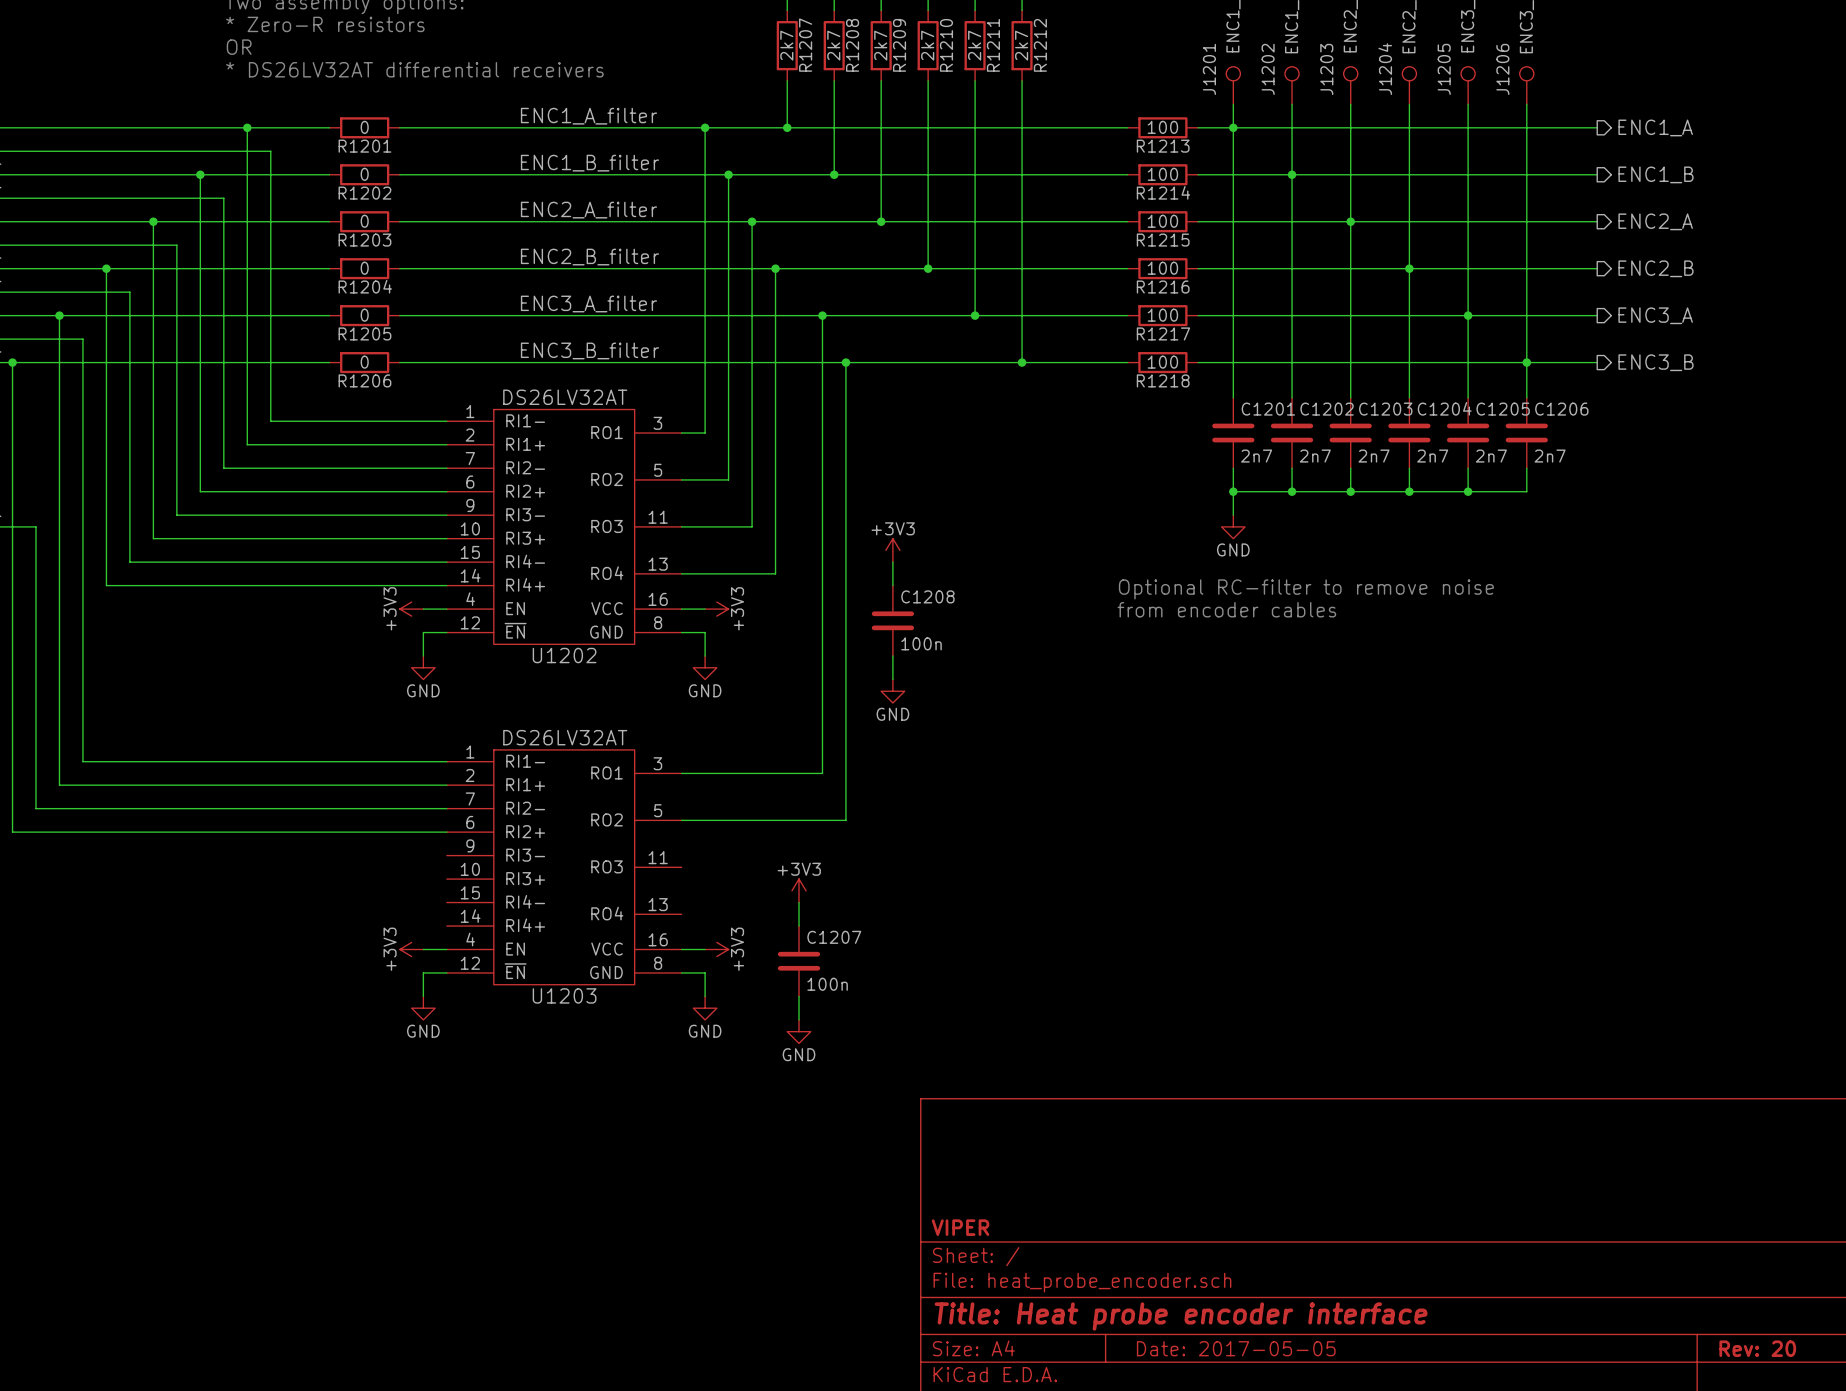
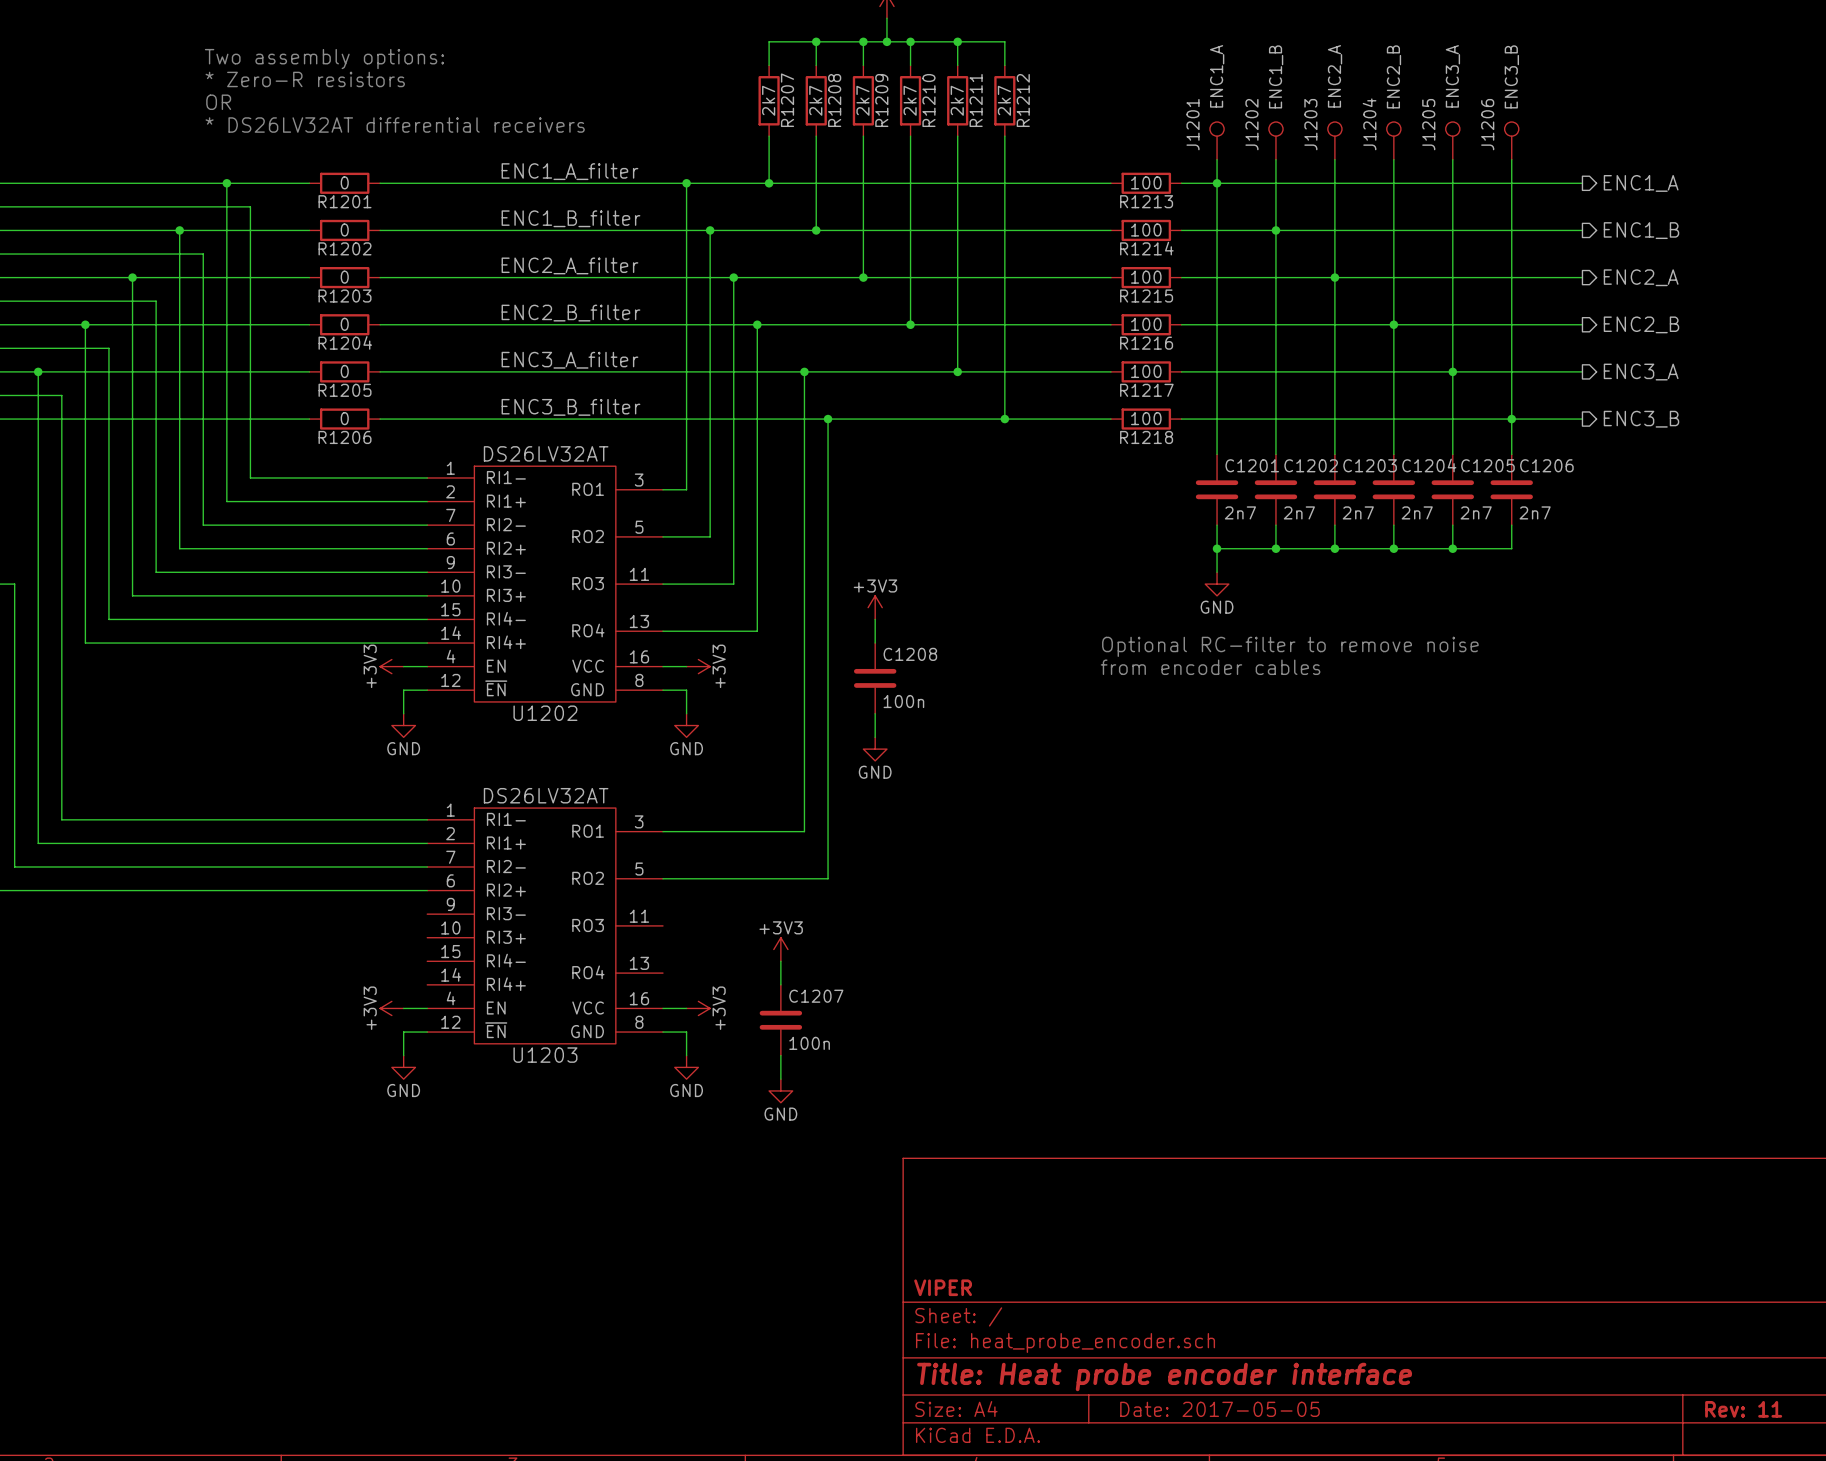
title block: Rev: 20 (1757, 1348) -> Rev: 11 (1743, 1409)

